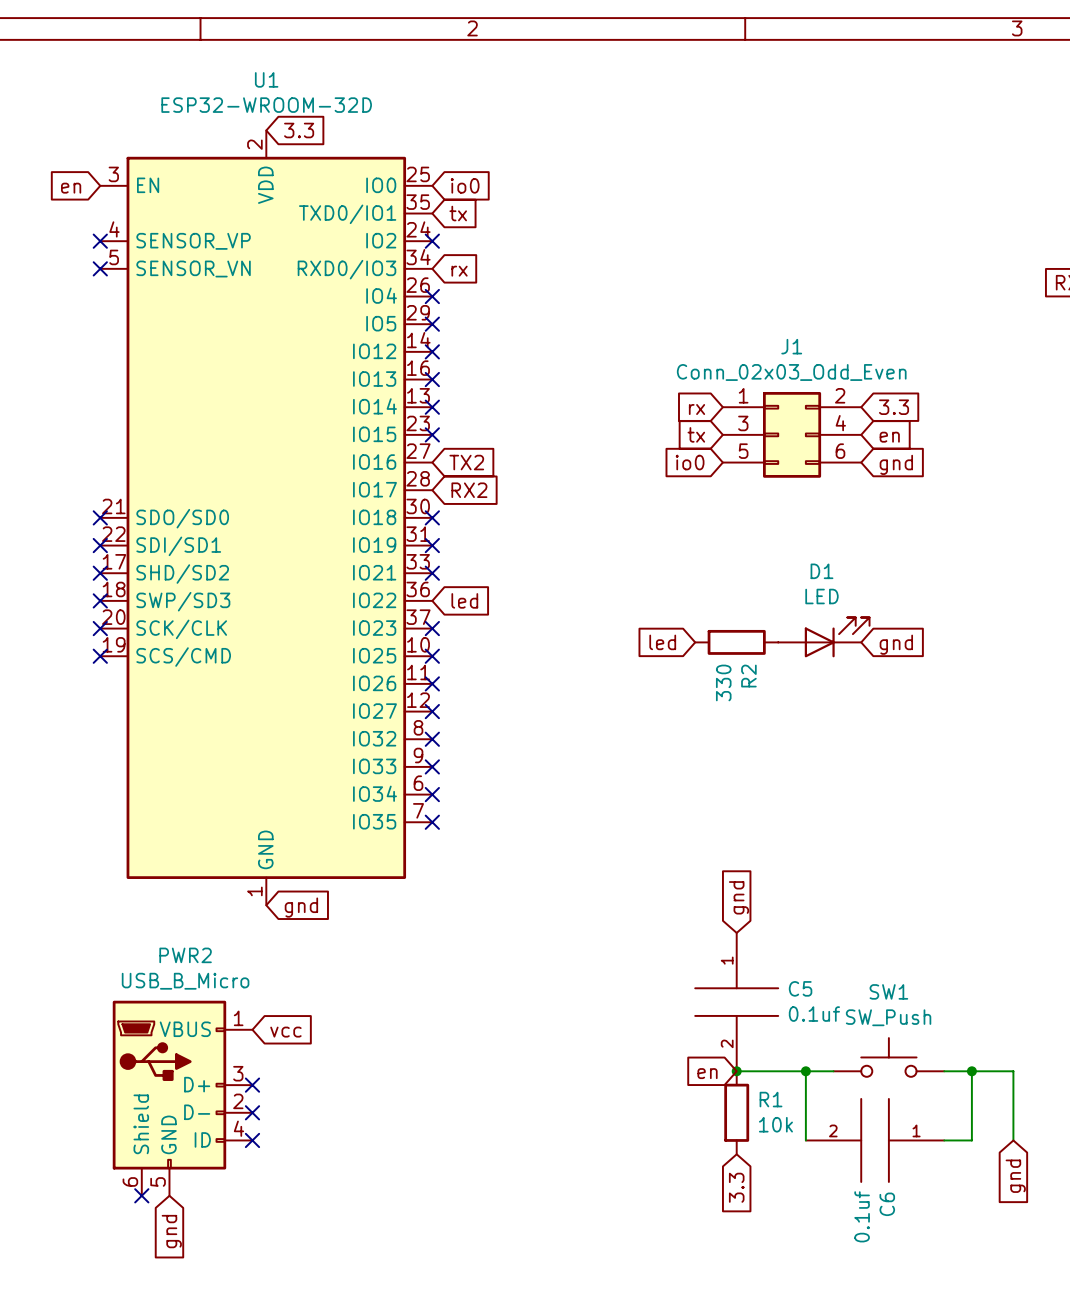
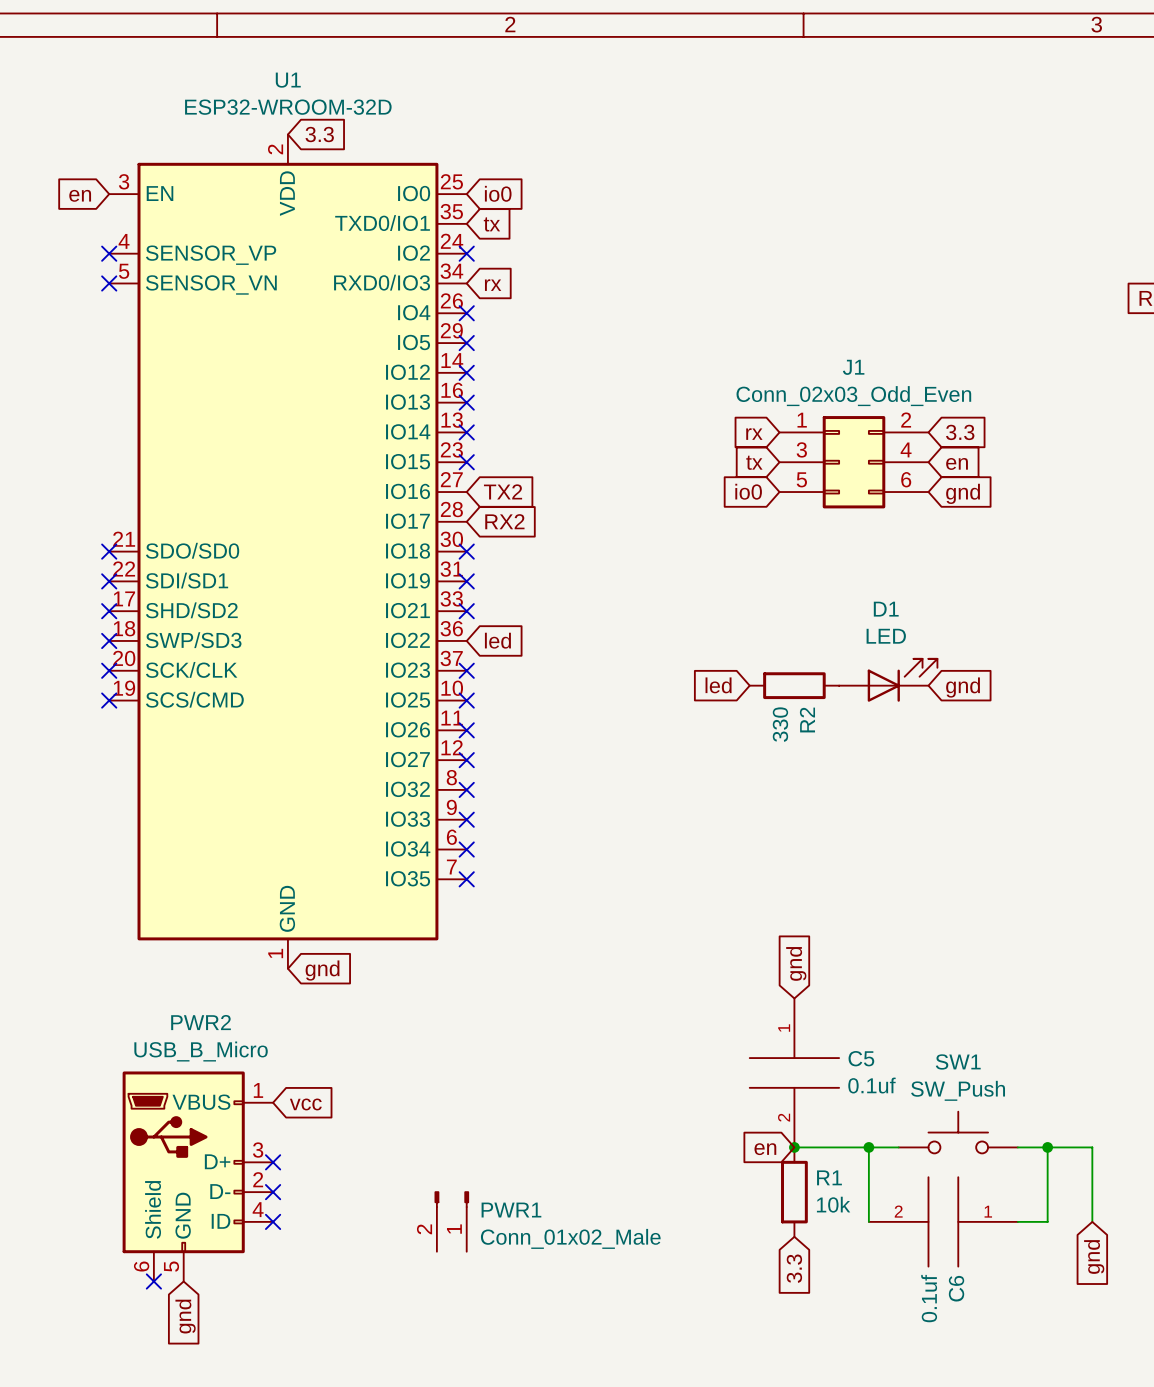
PWR1: none -> Conn_01x02_Male (451, 1221)

